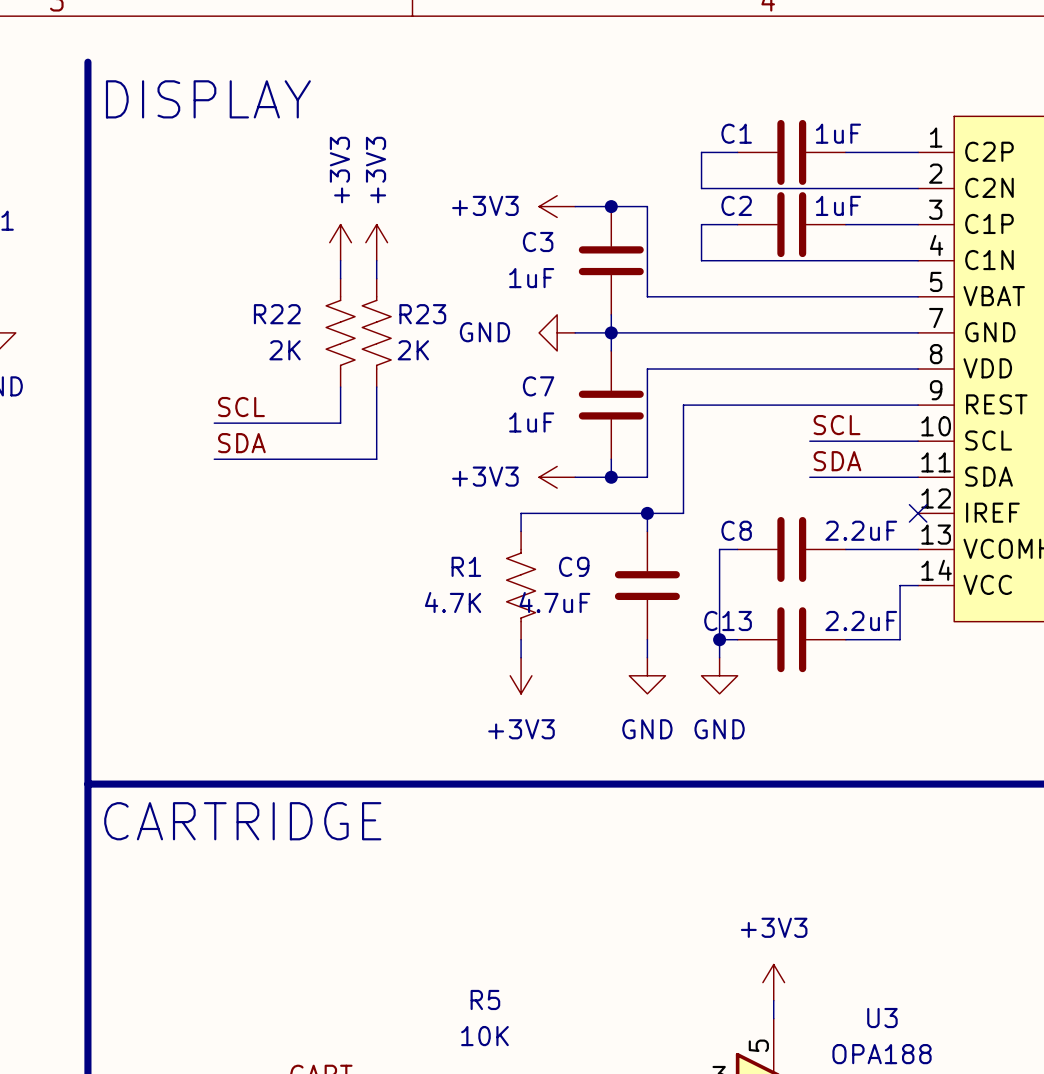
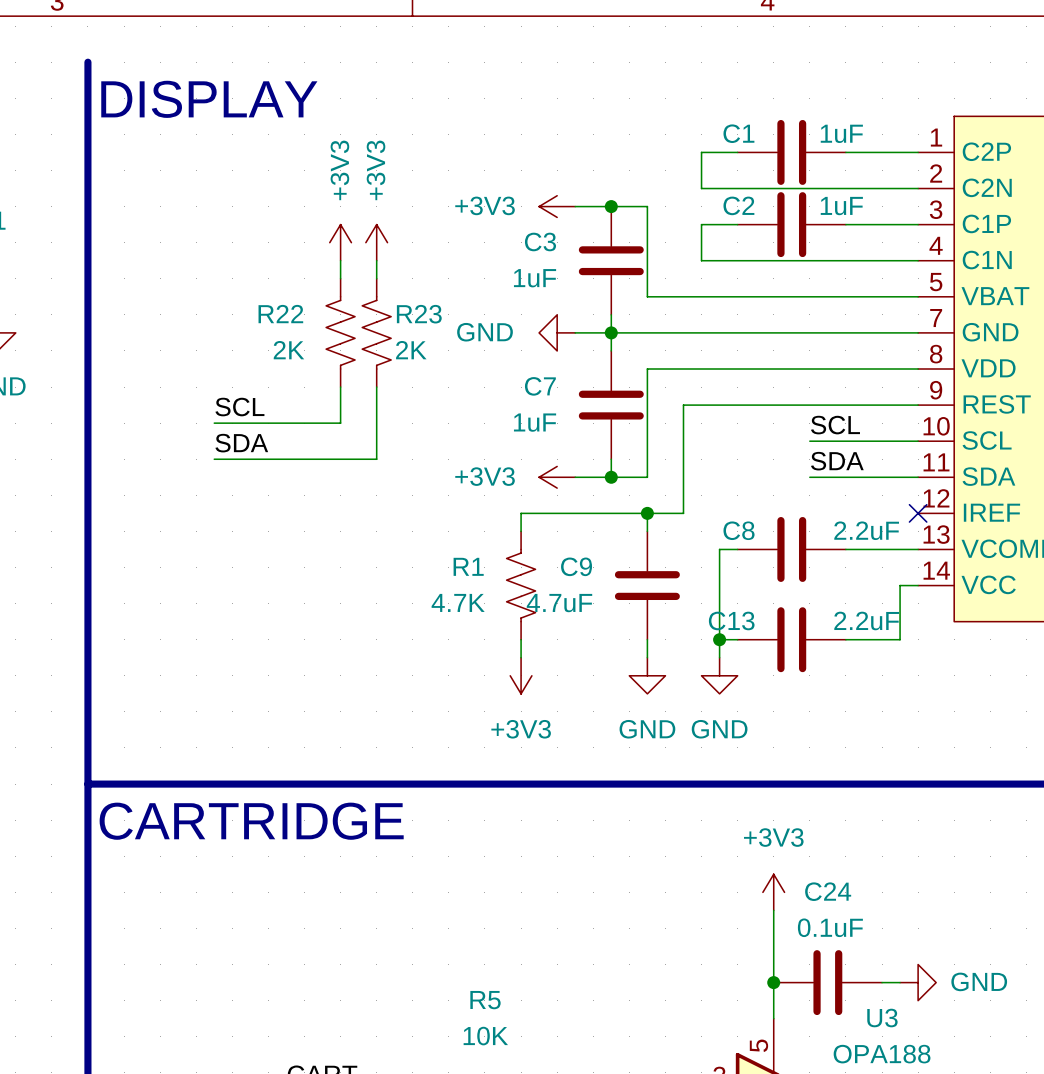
wire: none -> (773, 910) (773, 1000)
power symbol position: +3V3 (773, 982) -> +3V3 (773, 892)
junction: none -> (773, 982)
C24: none -> 0.1uF (827, 982)
wire: none -> (882, 982) (900, 982)
power symbol: none -> GND (918, 982)

